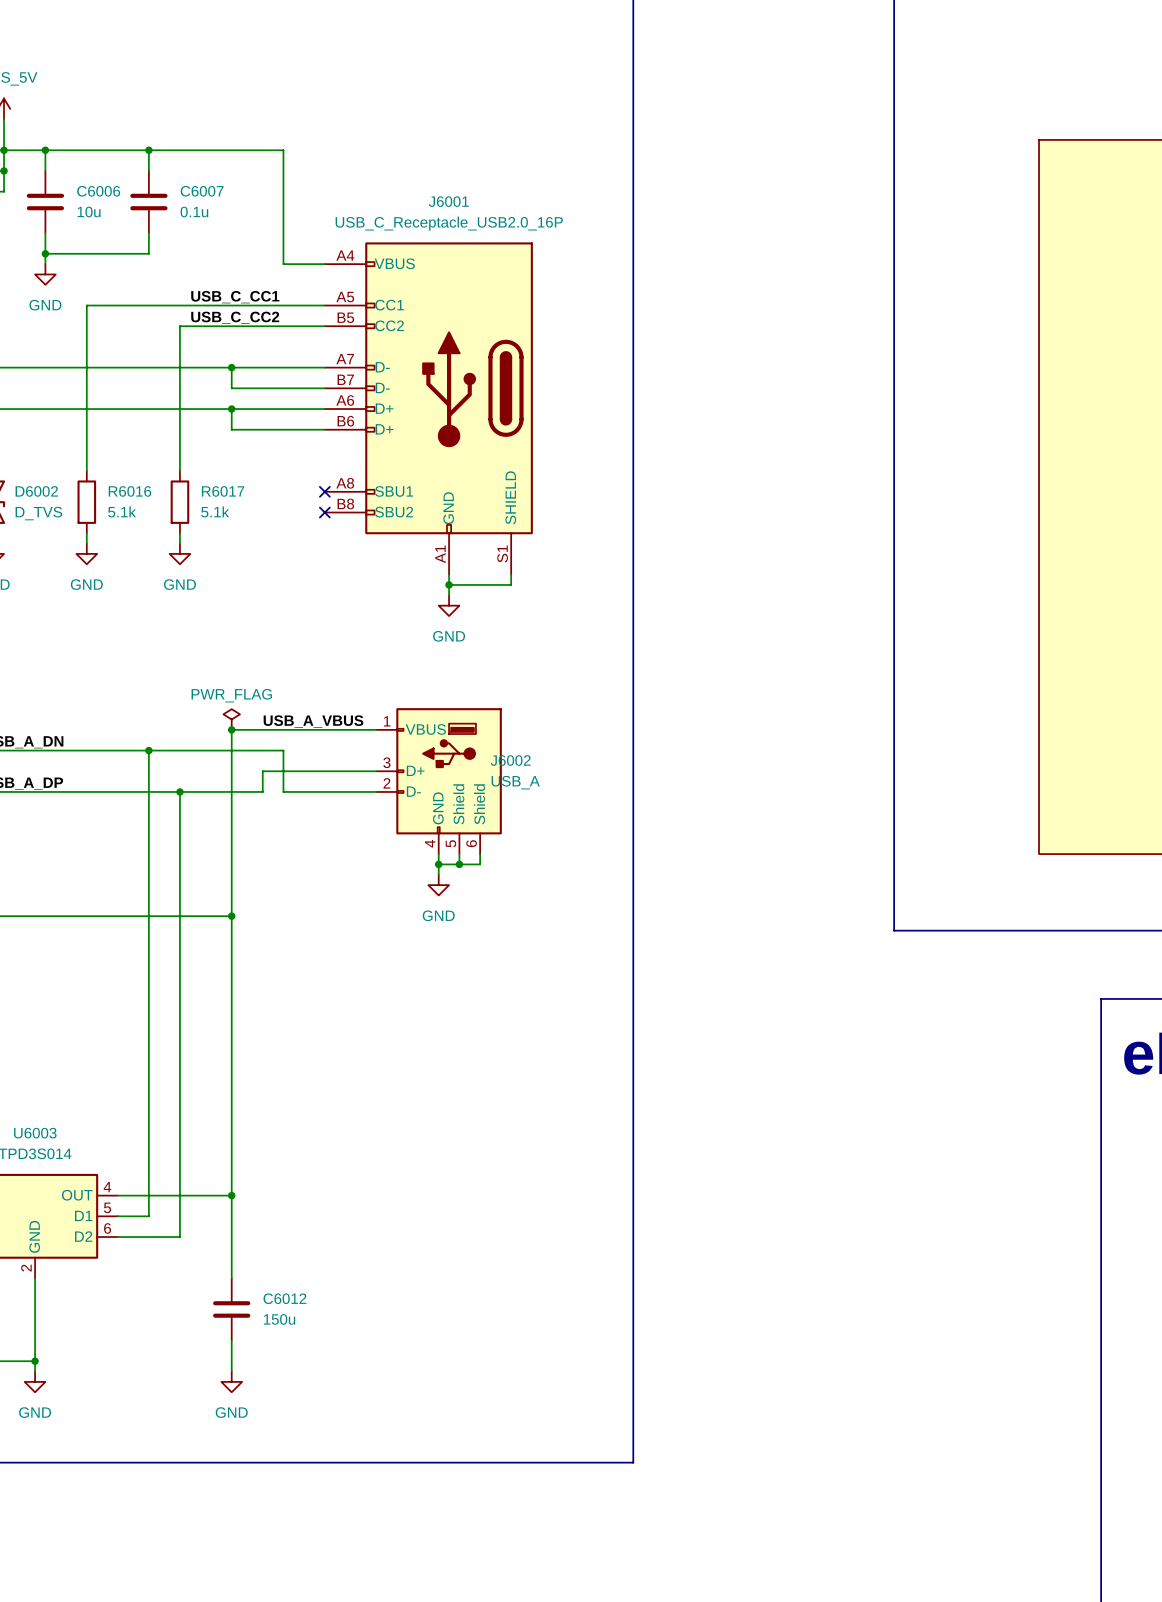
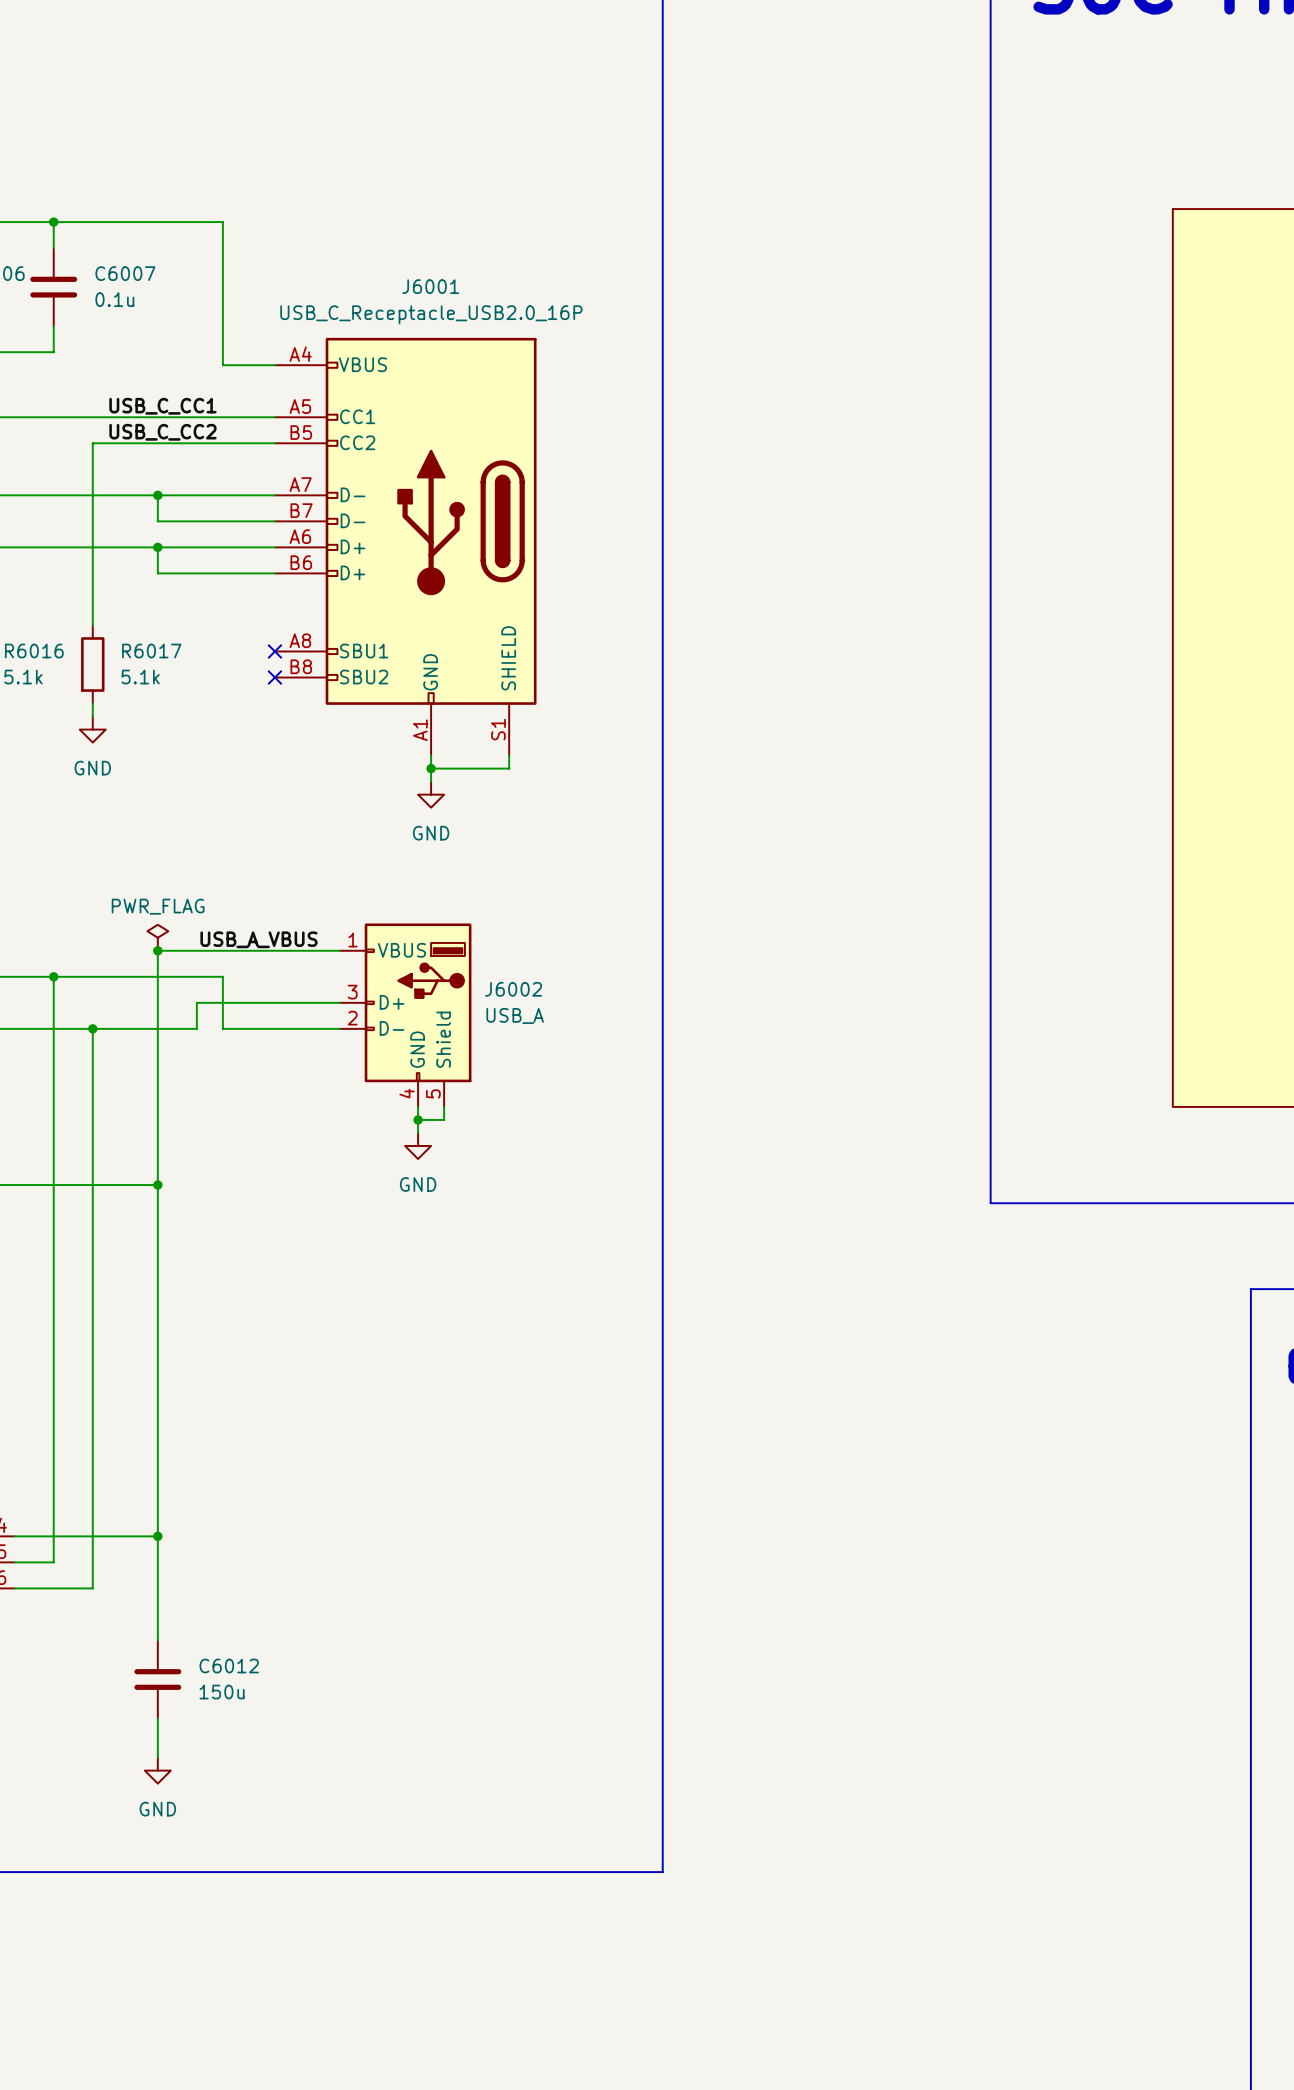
J6002 symbol: [376, 708, 502, 855] -> [340, 923, 472, 1107]
wire: (480, 854) (480, 864) (459, 864) -> none
junction: (459, 864) -> none

